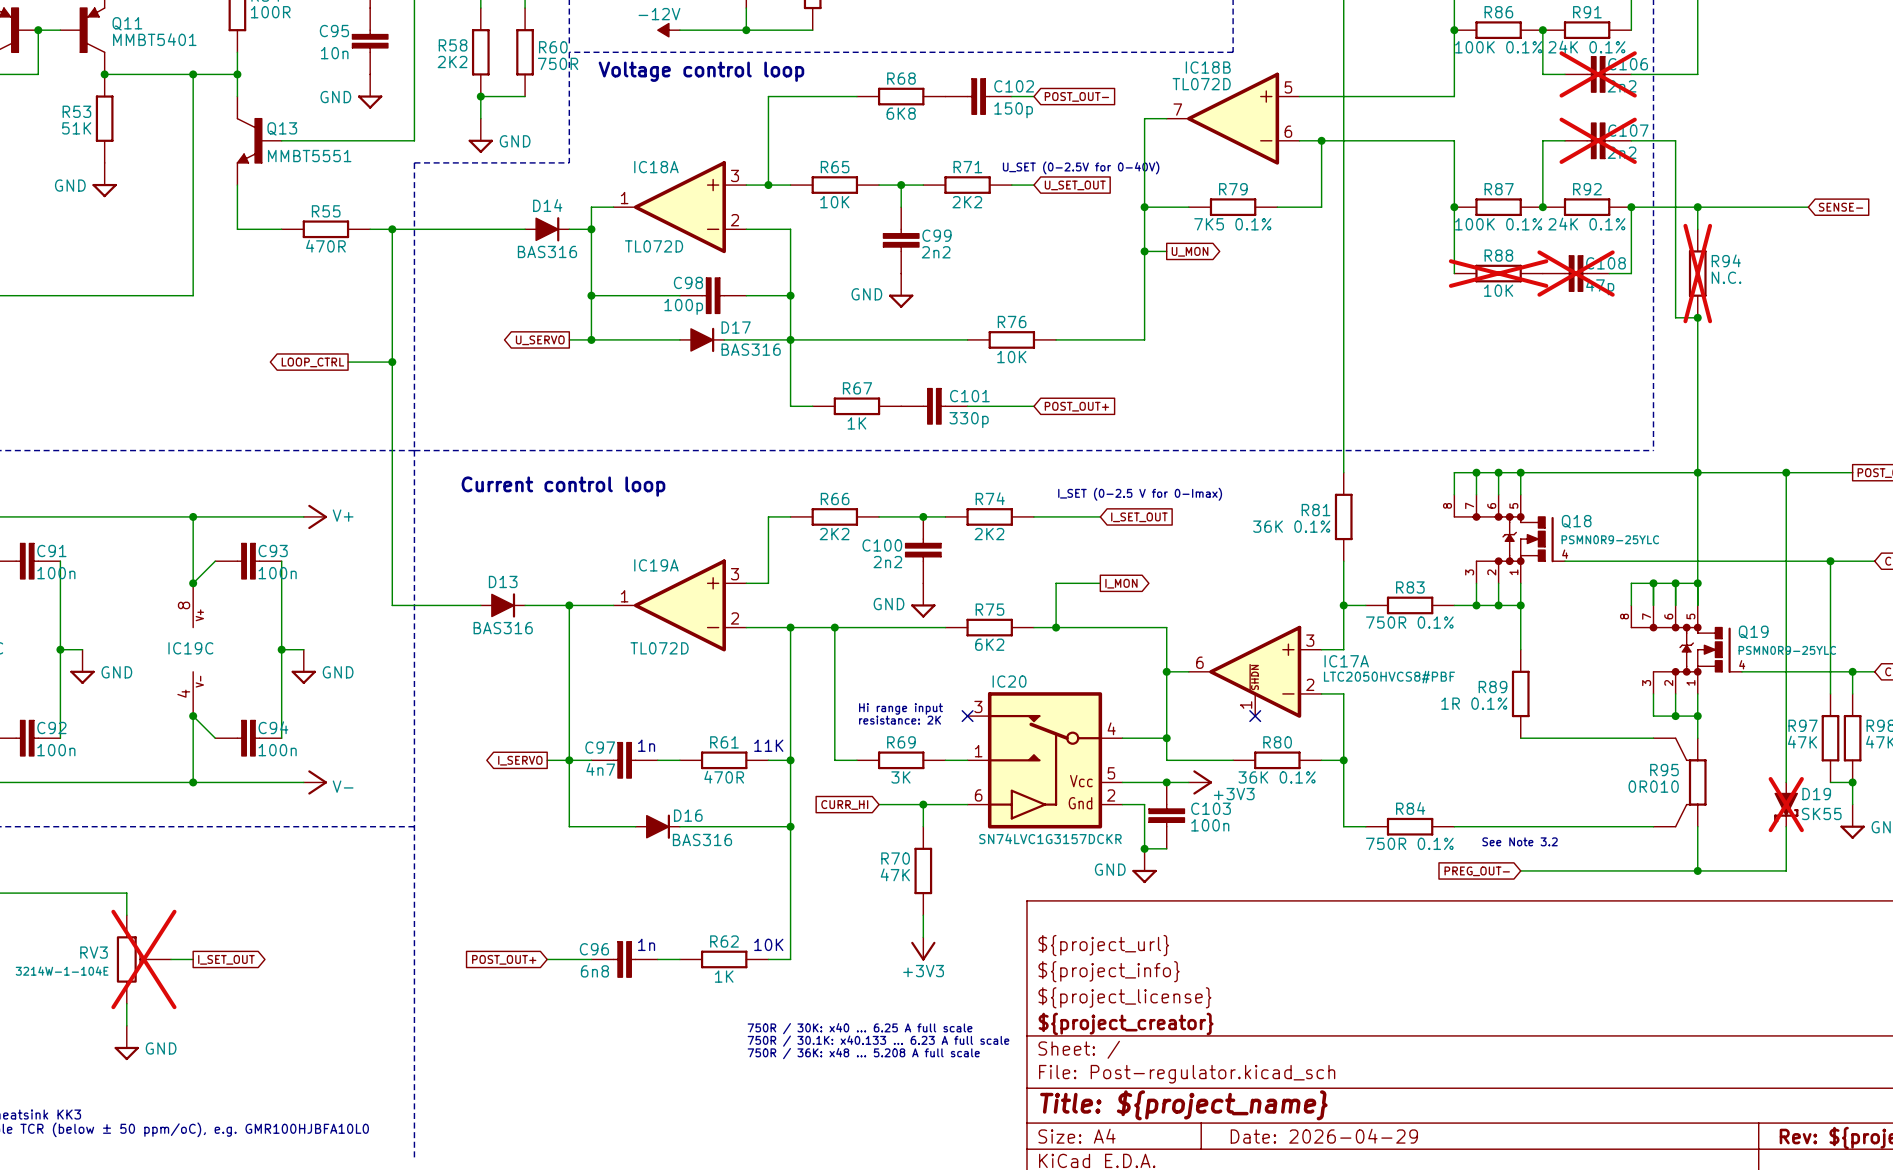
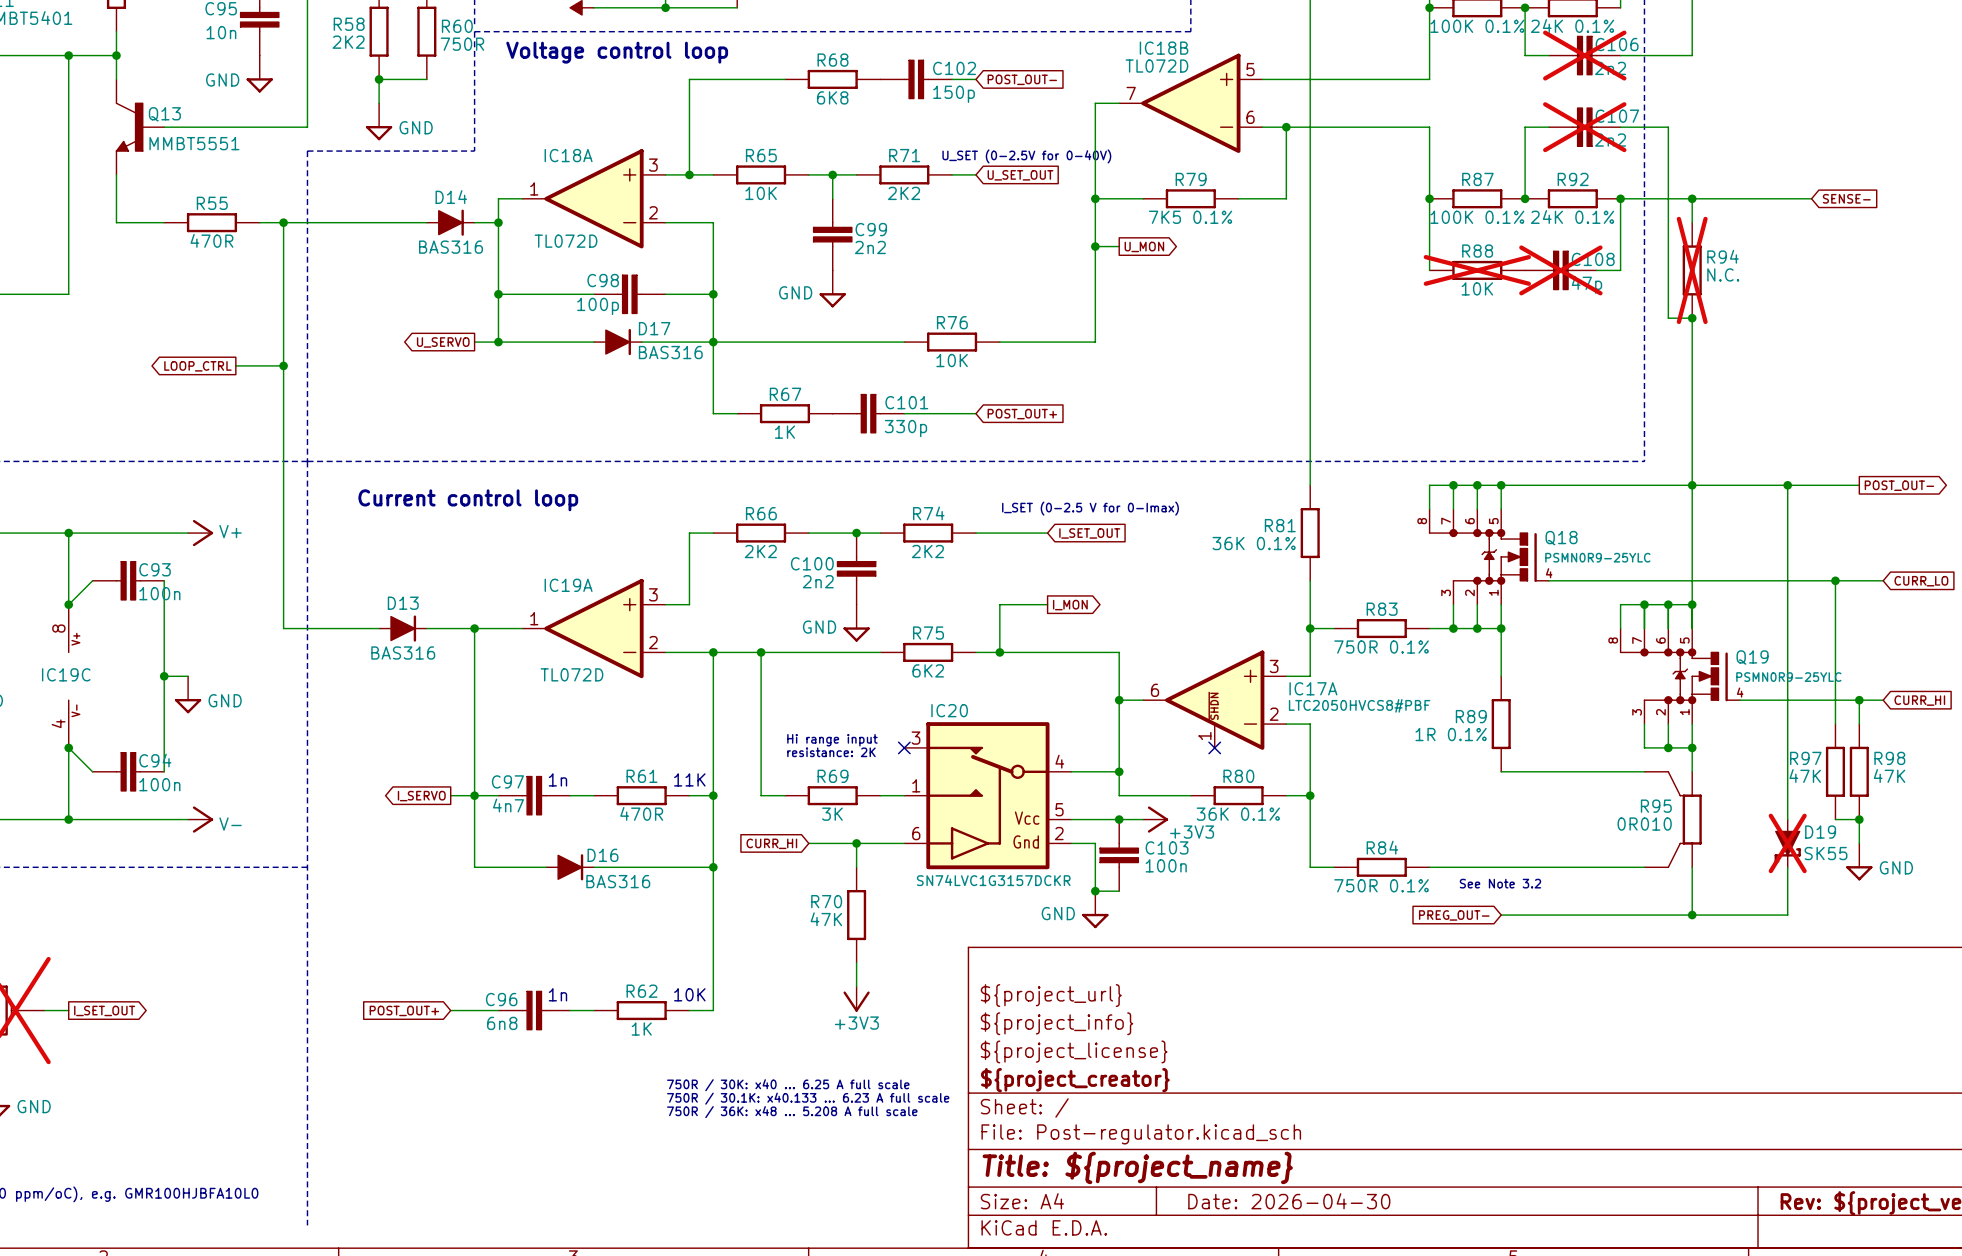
title block: Date: 2026-04-29 (1324, 1136) -> Date: 2026-04-30 (1289, 1201)

